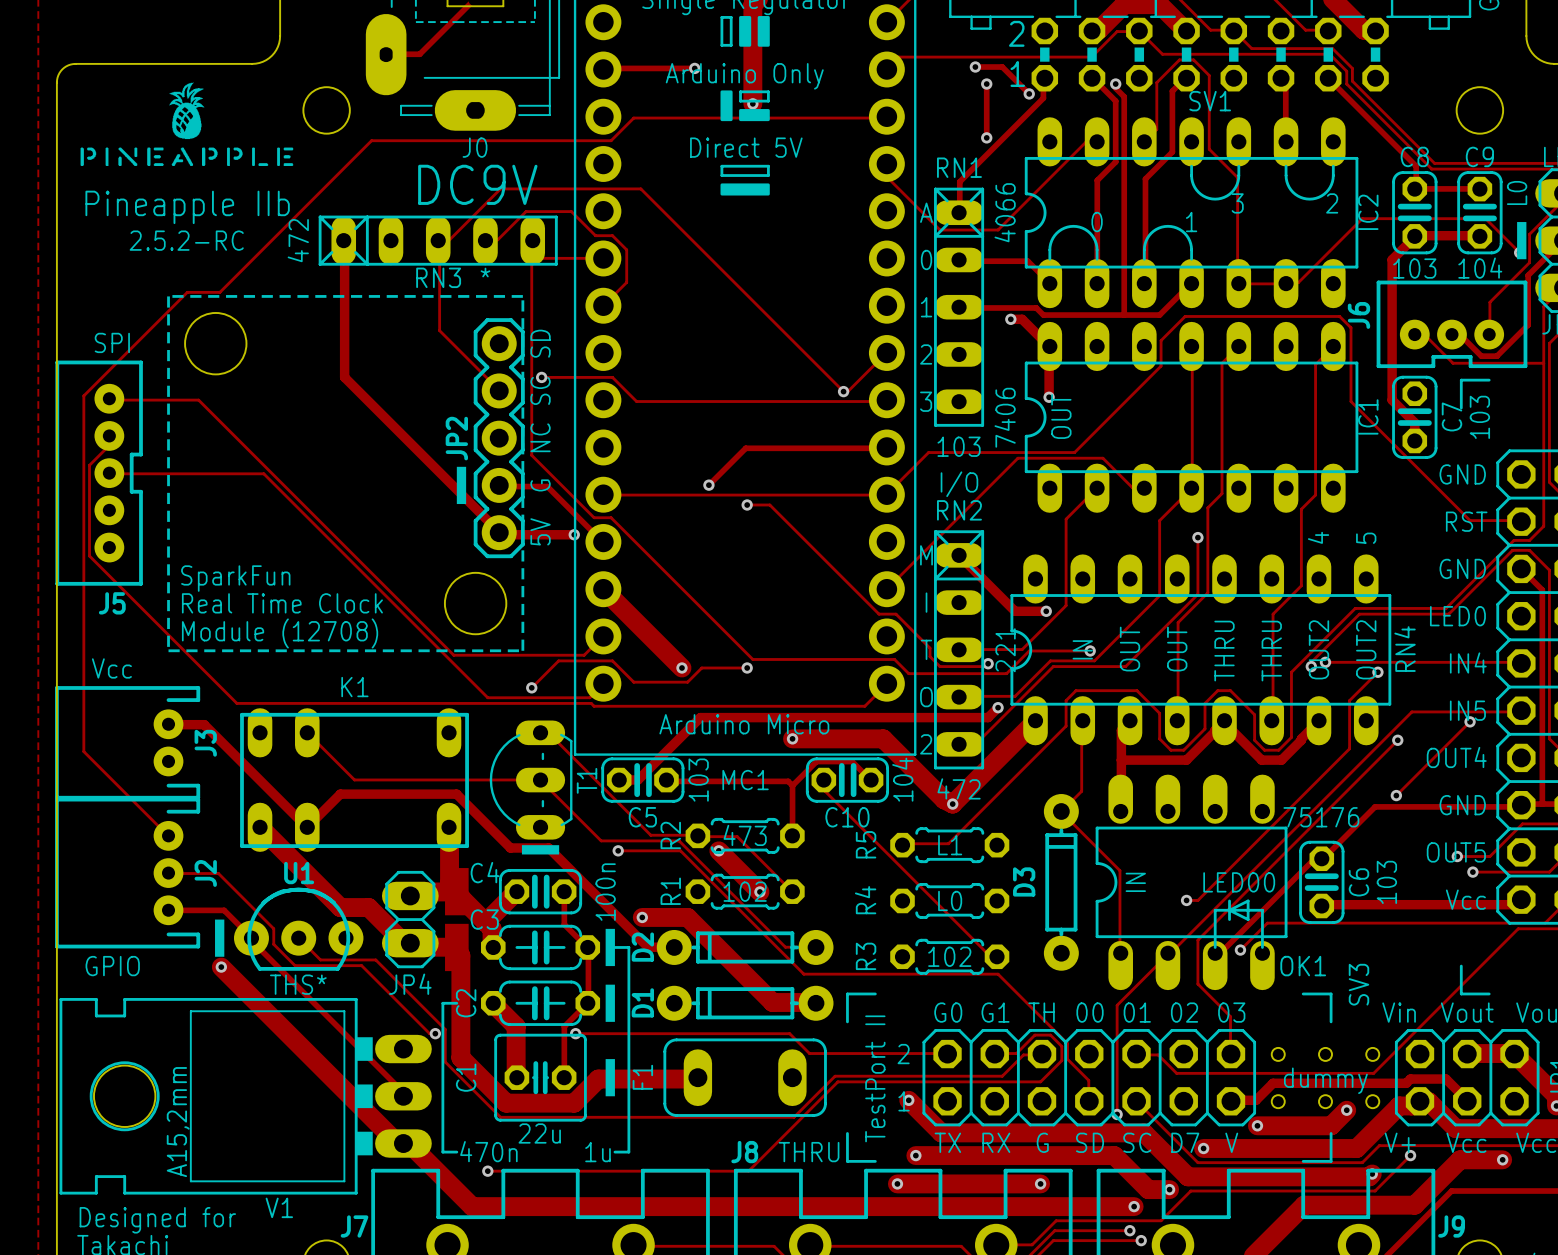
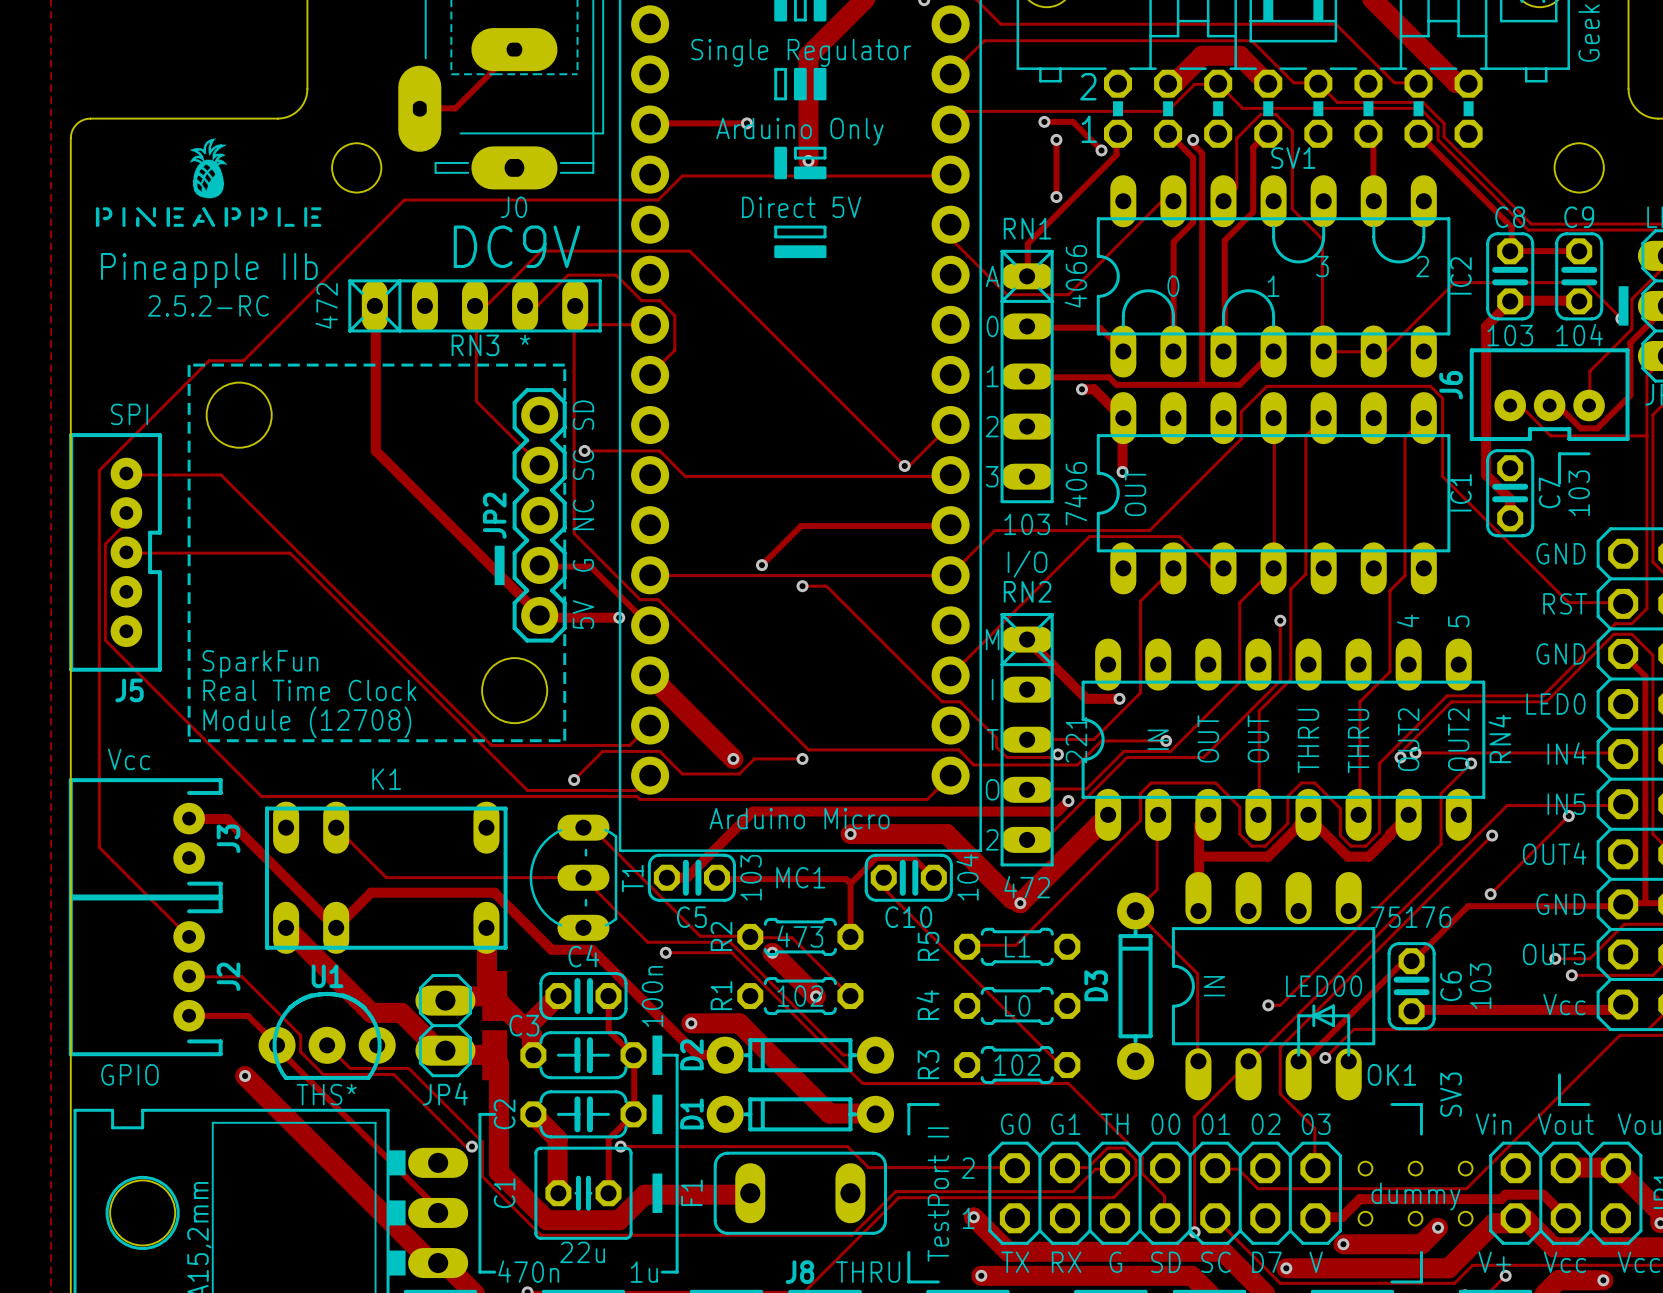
text: L0 (1517, 192) -> none
drawing: [521, 845, 560, 855] -> none
C4 name position: C4 (485, 872) -> C4 (583, 956)
drawing: [215, 919, 225, 957] -> none

